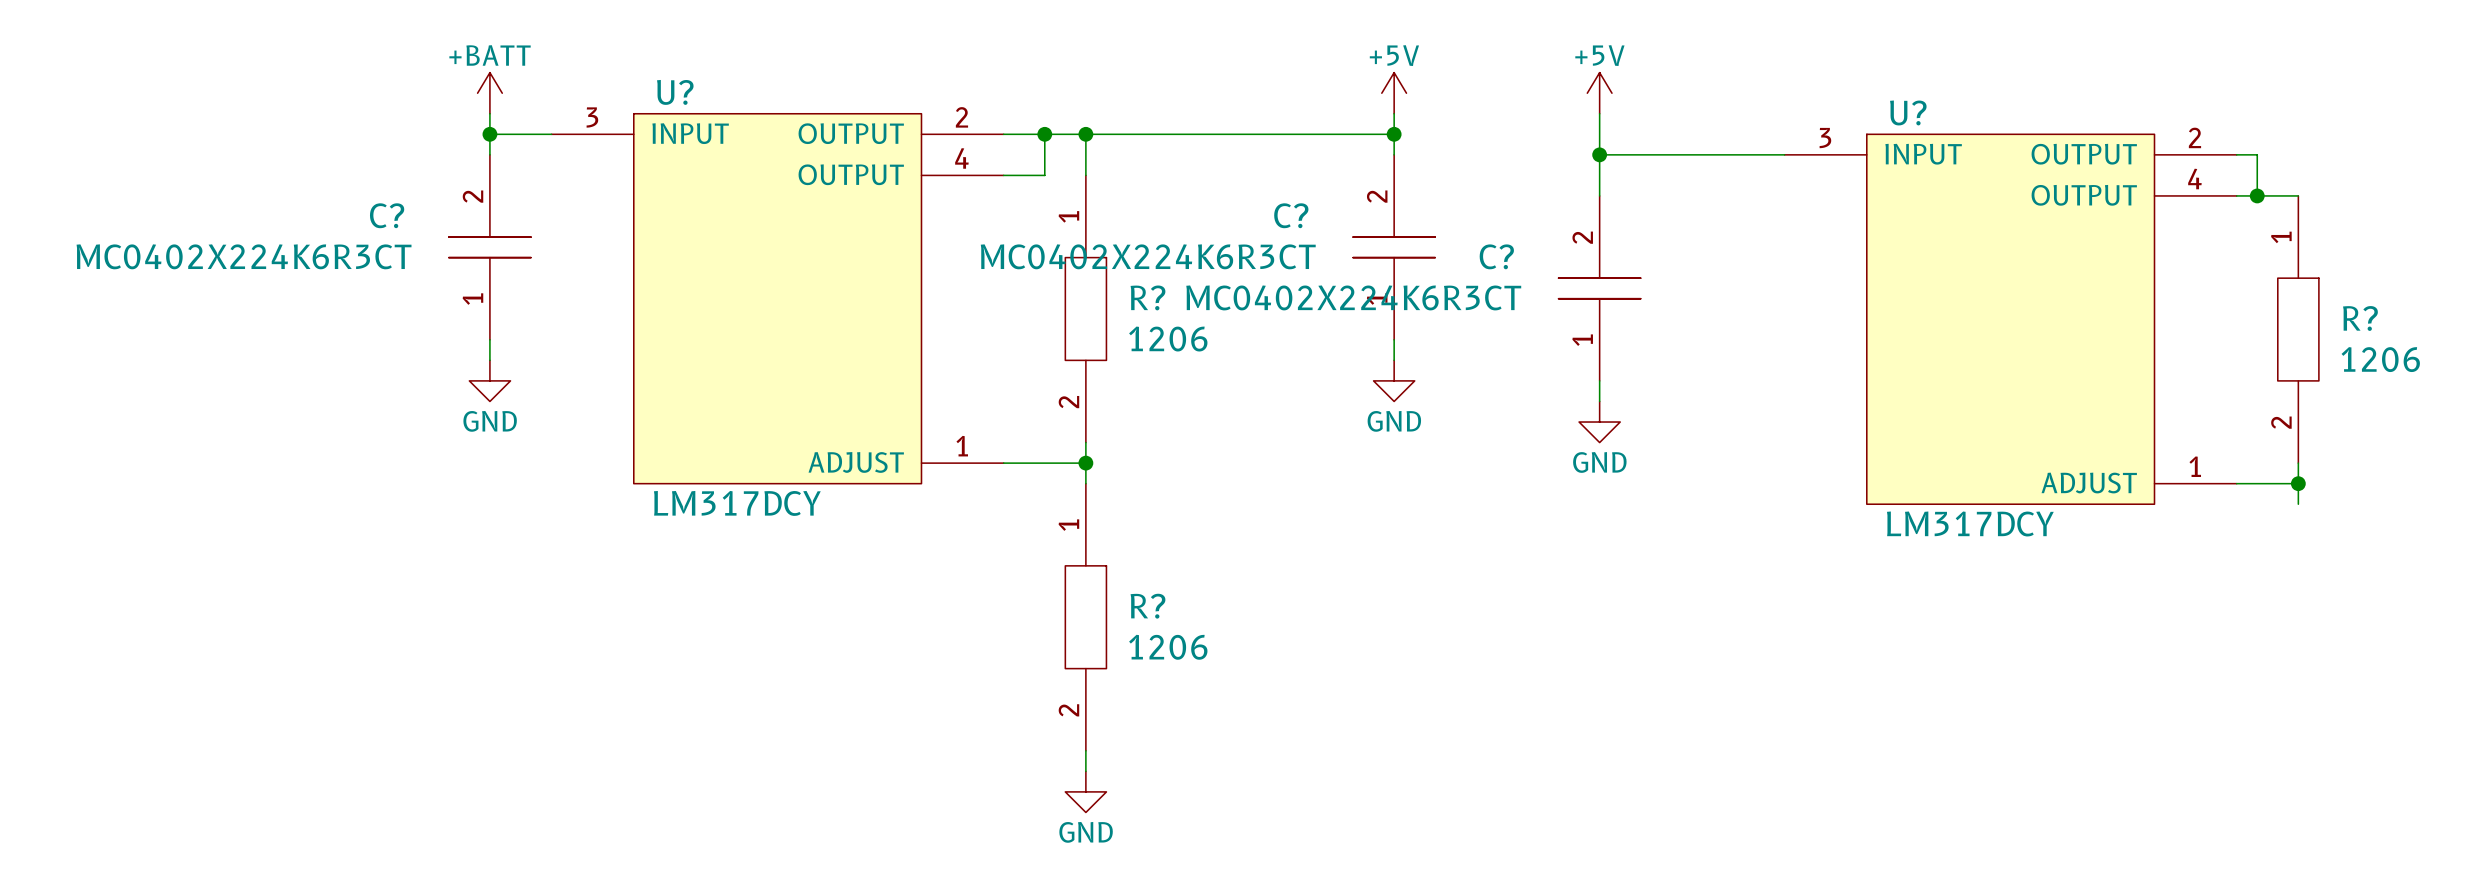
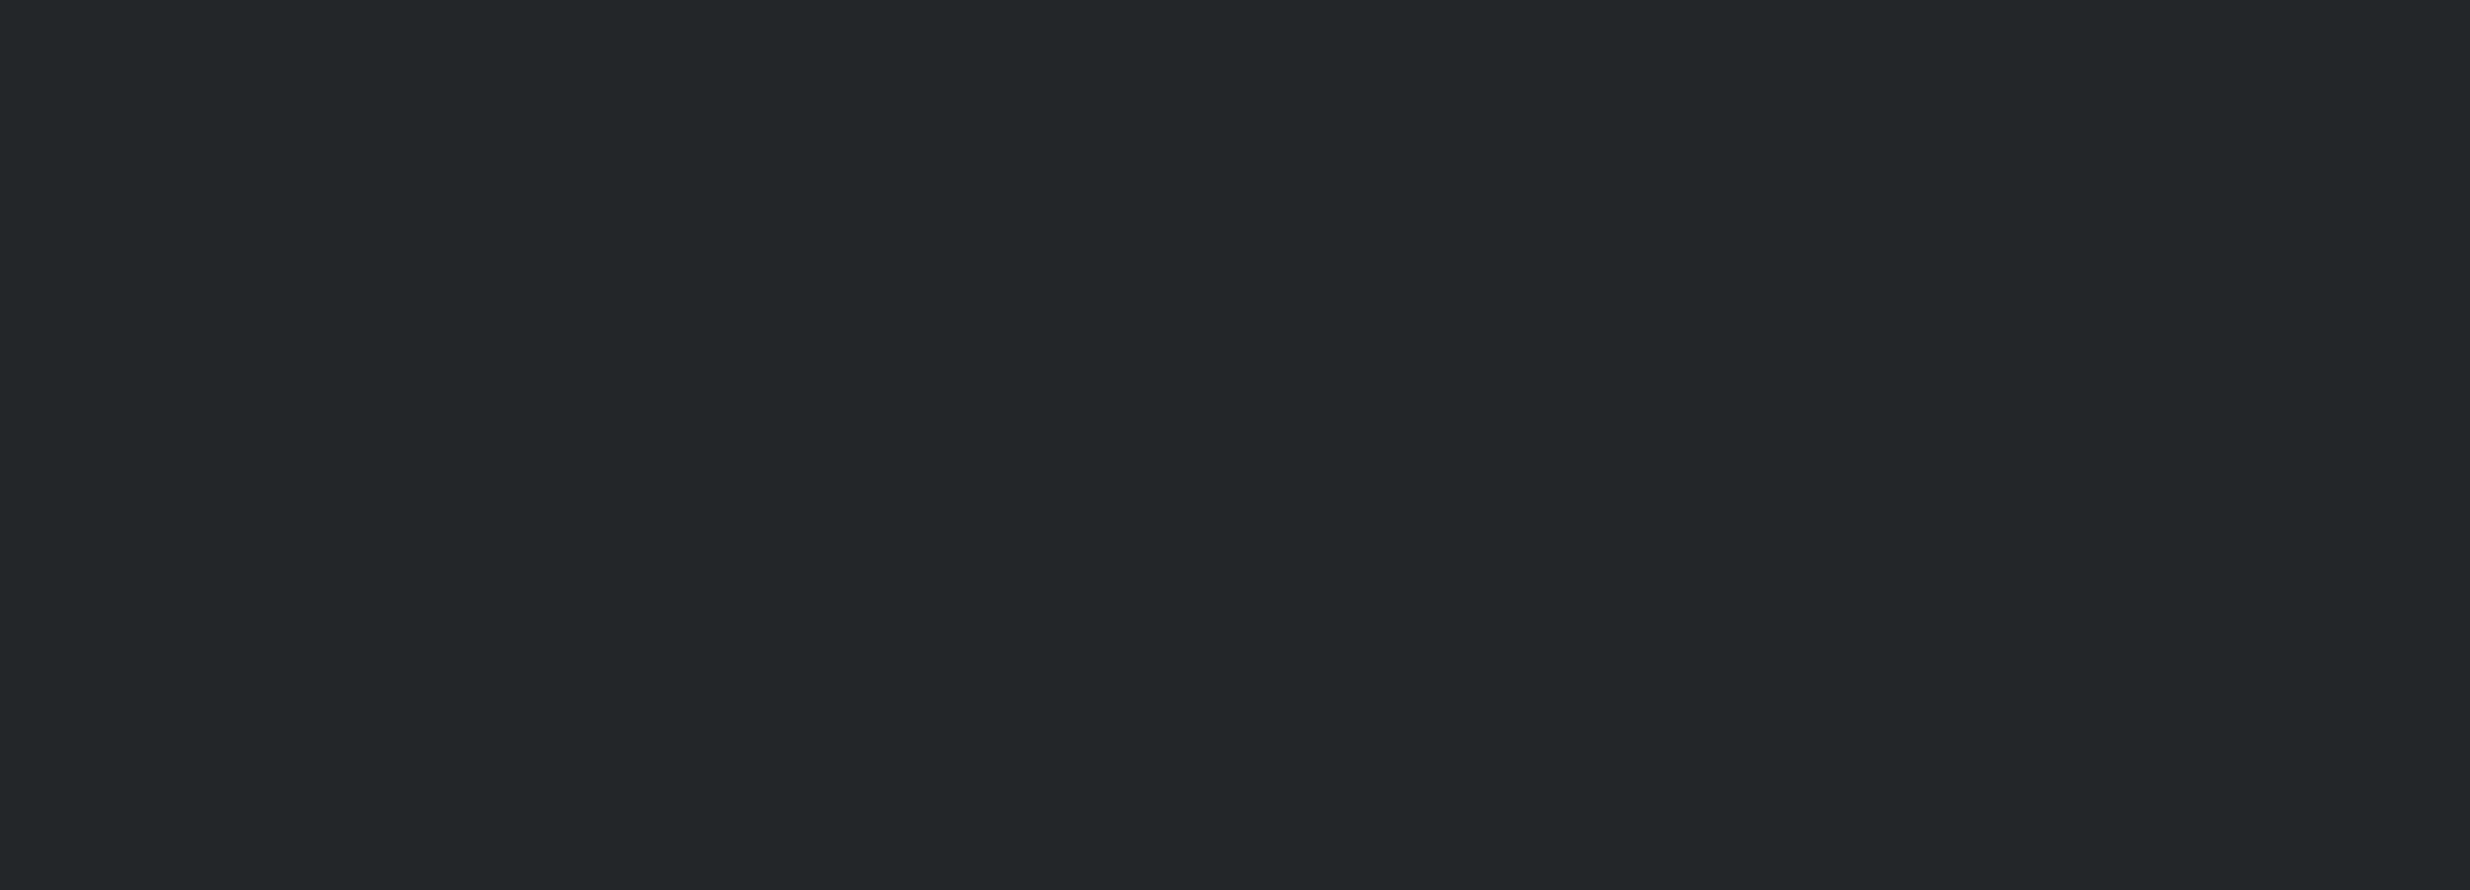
power symbol: +BATT (489, 93) -> none
power symbol: +5V (1394, 93) -> none
power symbol: +5V (1599, 93) -> none
wire: (489, 113) (489, 154) -> none
wire: (1394, 113) (1394, 154) -> none
wire: (1599, 113) (1599, 195) -> none
wire: (489, 134) (551, 134) -> none
junction: (489, 134) -> none
wire: (1003, 134) (1394, 134) -> none
wire: (1044, 134) (1044, 175) (1003, 175) -> none
junction: (1044, 134) -> none
wire: (1085, 134) (1085, 175) -> none
junction: (1085, 134) -> none
junction: (1394, 134) -> none
wire: (1599, 154) (1784, 154) -> none
junction: (1599, 154) -> none
wire: (2236, 154) (2257, 154) (2257, 195) -> none
wire: (2236, 195) (2298, 195) -> none
junction: (2257, 195) -> none
C?: MC0402X224K6R3CT (489, 247) -> none
C?: MC0402X224K6R3CT (1394, 247) -> none
C?: MC0402X224K6R3CT (1599, 288) -> none
U?: LM317DCY (777, 298) -> none
R?: 1206 (1085, 308) -> none
U?: LM317DCY (2010, 319) -> none
R?: 1206 (2298, 329) -> none
wire: (489, 339) (489, 360) -> none
wire: (1394, 339) (1394, 360) -> none
power symbol: GND (489, 380) -> none
power symbol: GND (1394, 380) -> none
wire: (1599, 380) (1599, 401) -> none
power symbol: GND (1599, 422) -> none
wire: (1085, 442) (1085, 483) -> none
wire: (1003, 463) (1085, 463) -> none
junction: (1085, 463) -> none
wire: (2298, 463) (2298, 504) -> none
wire: (2236, 483) (2298, 483) -> none
junction: (2298, 483) -> none
R?: 1206 (1085, 617) -> none
wire: (1085, 750) (1085, 771) -> none
power symbol: GND (1085, 791) -> none

